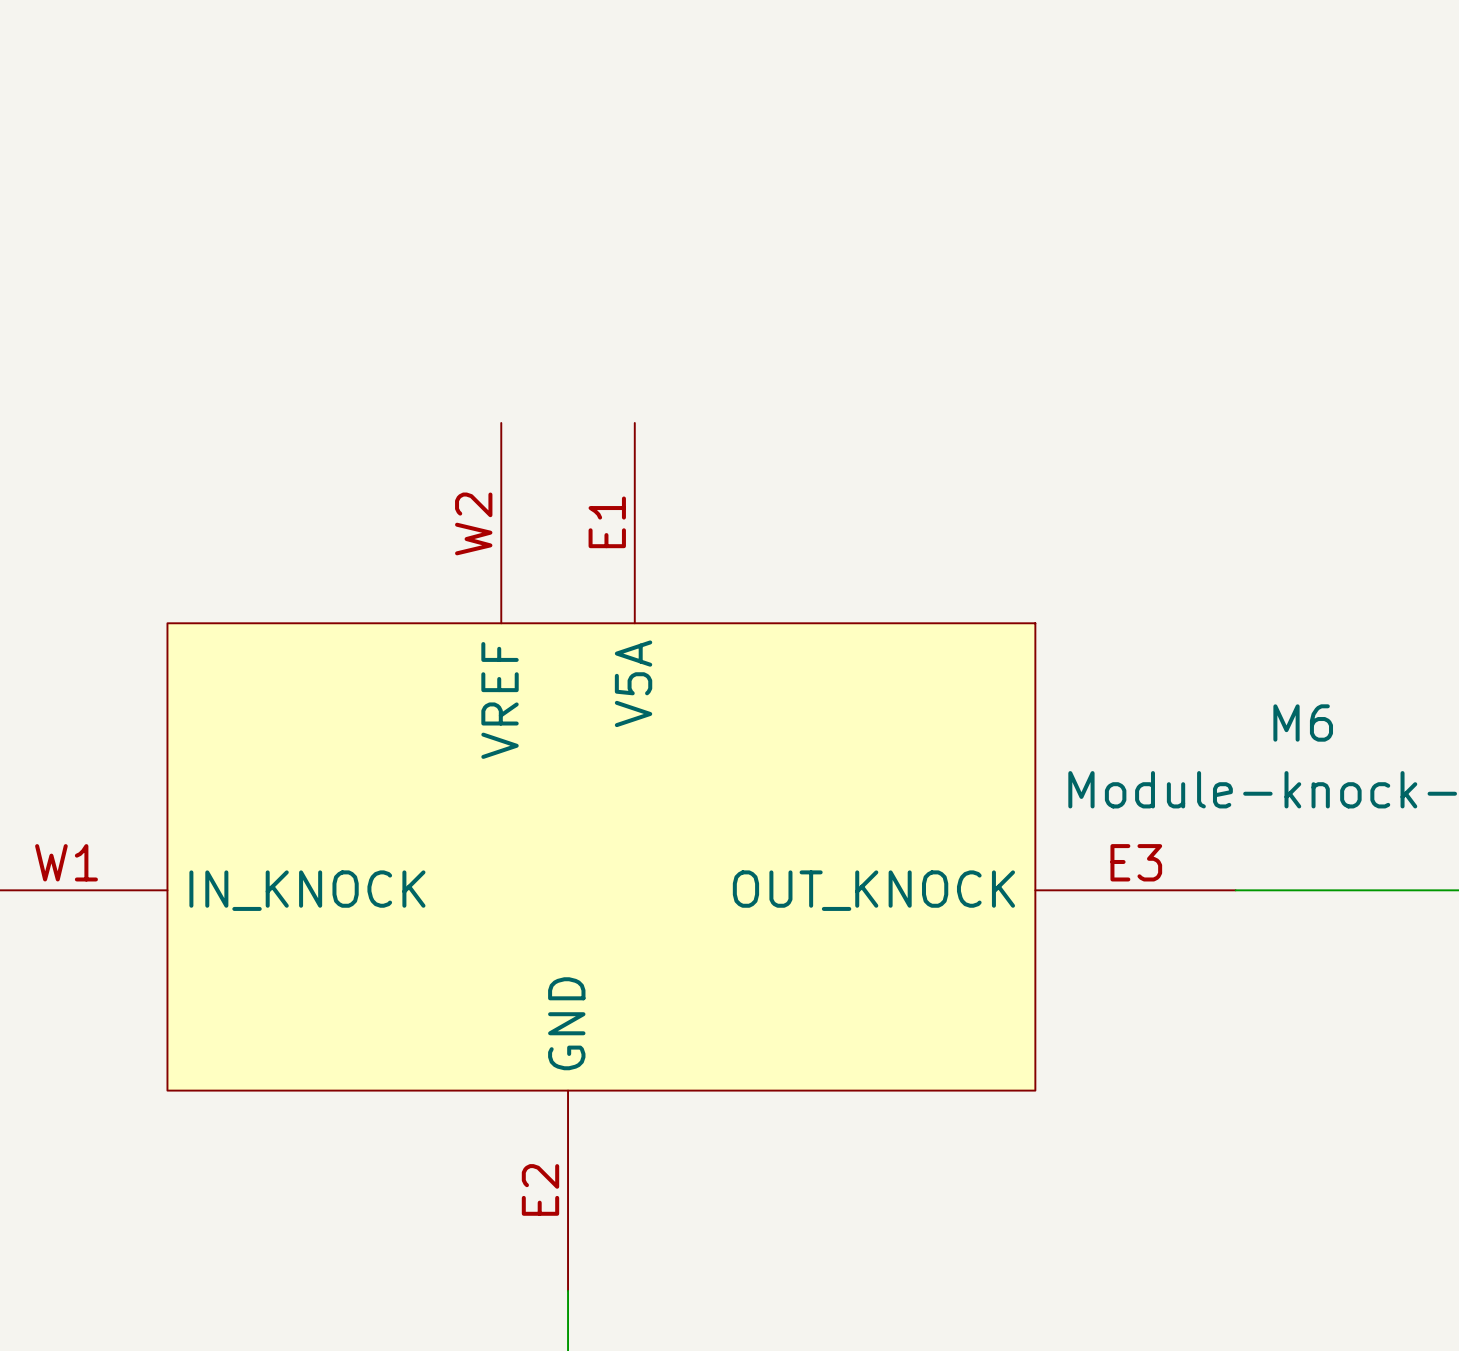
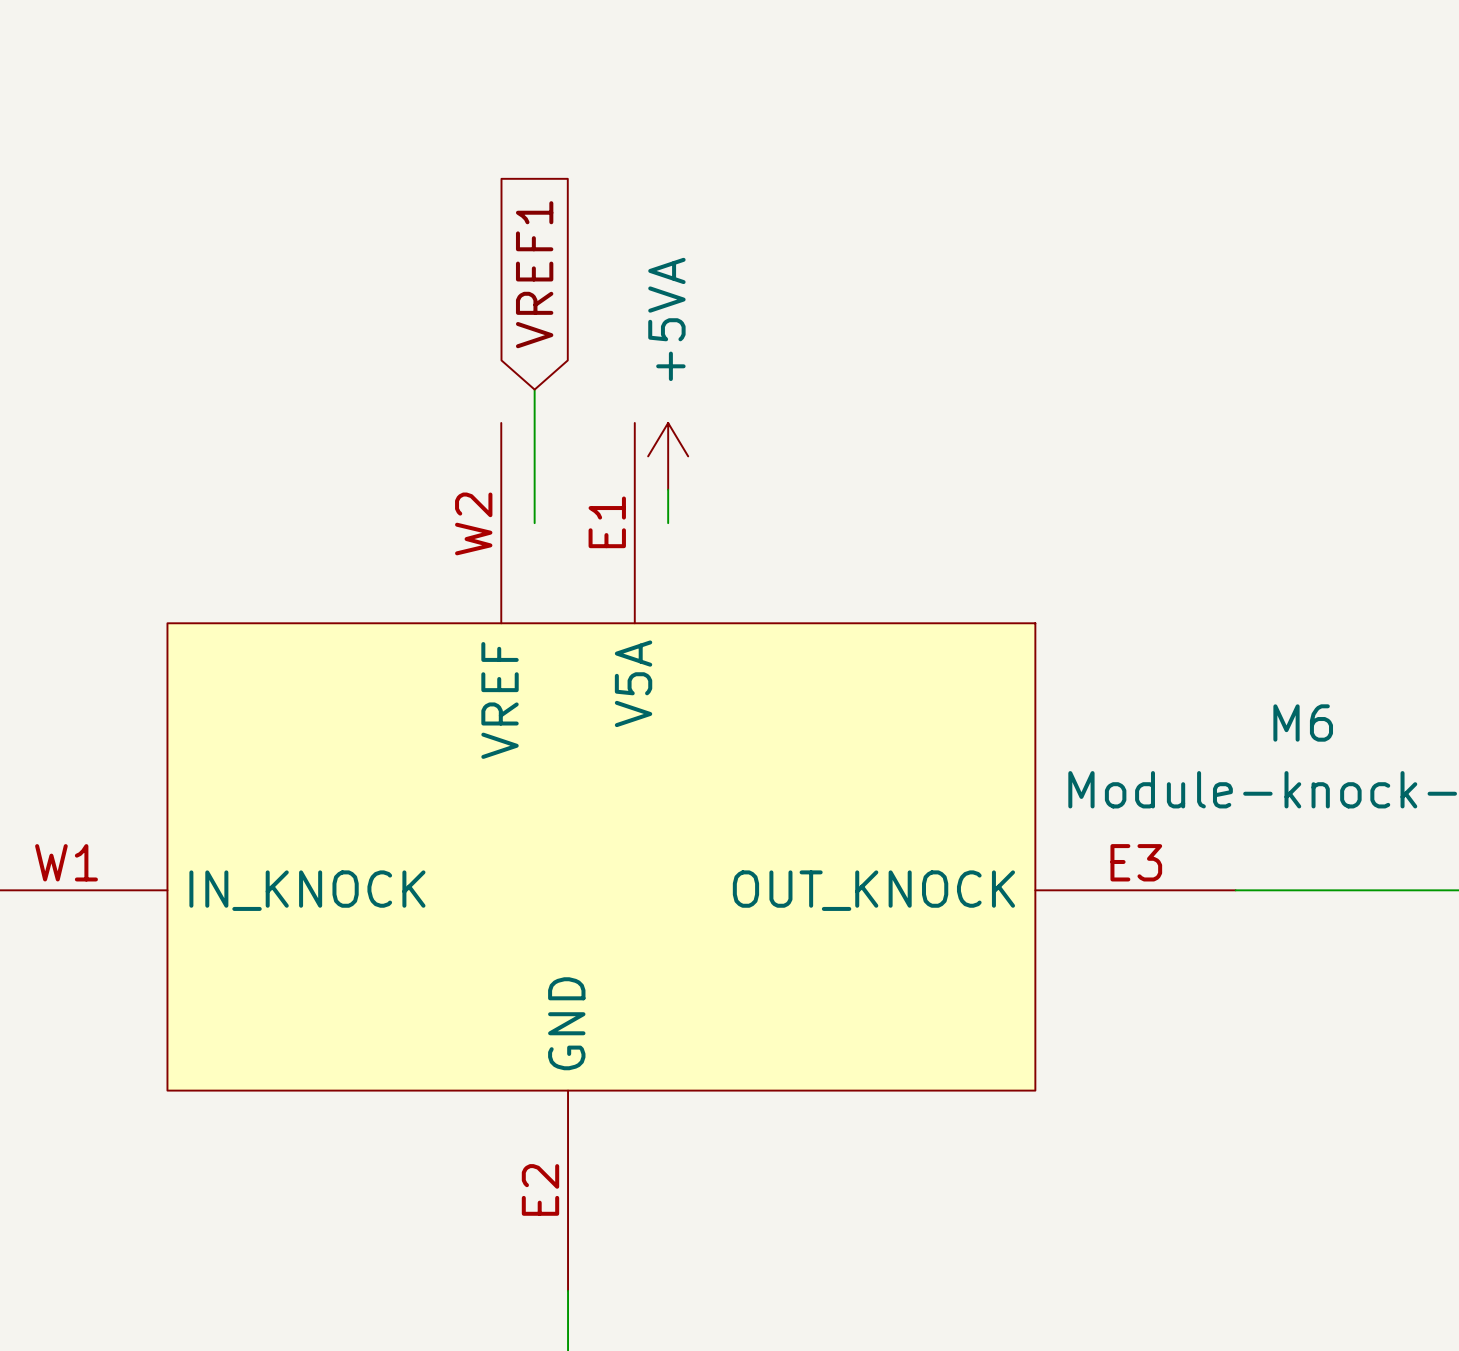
global label: none -> VREF1 (534, 274)
wire: none -> (534, 389) (534, 523)
power symbol: none -> +5VA (668, 456)
wire: none -> (668, 489) (668, 523)

